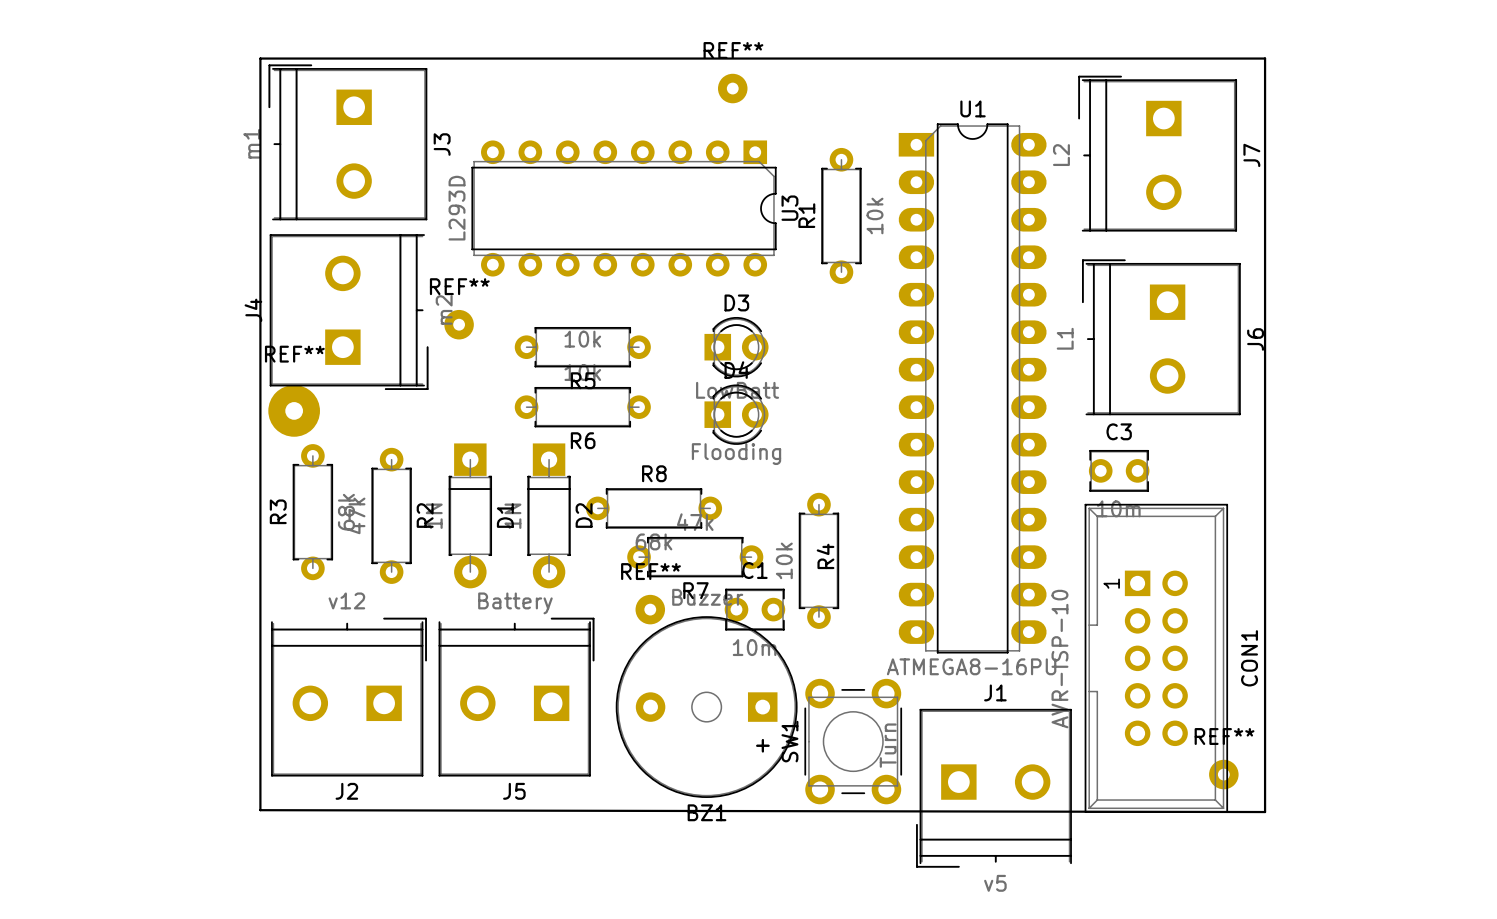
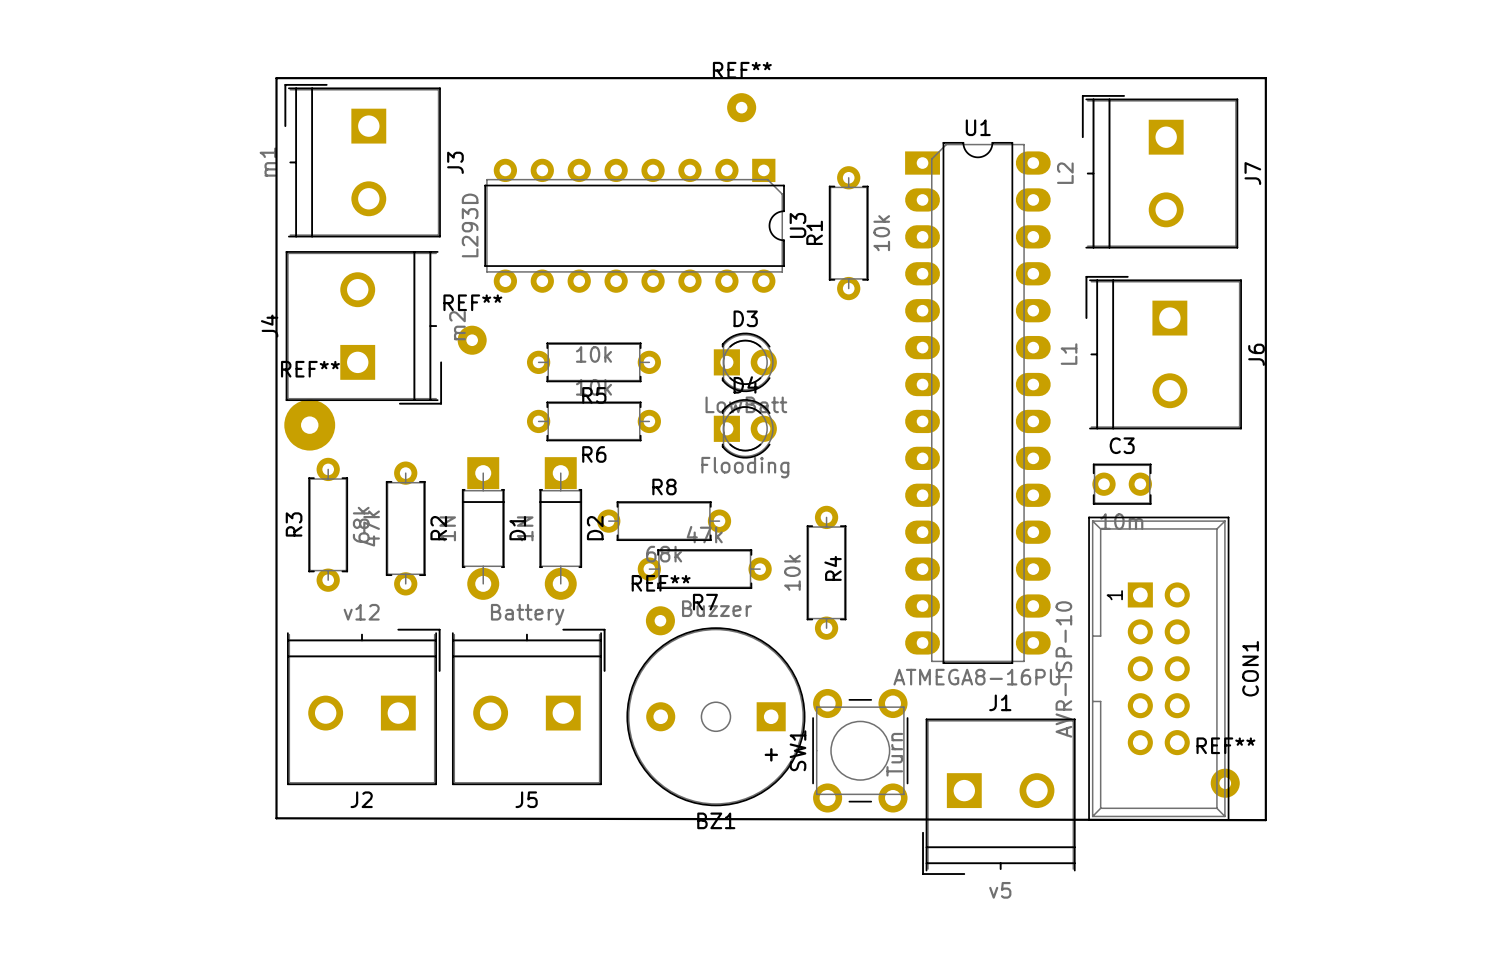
C1: 10m (754, 609) -> none

